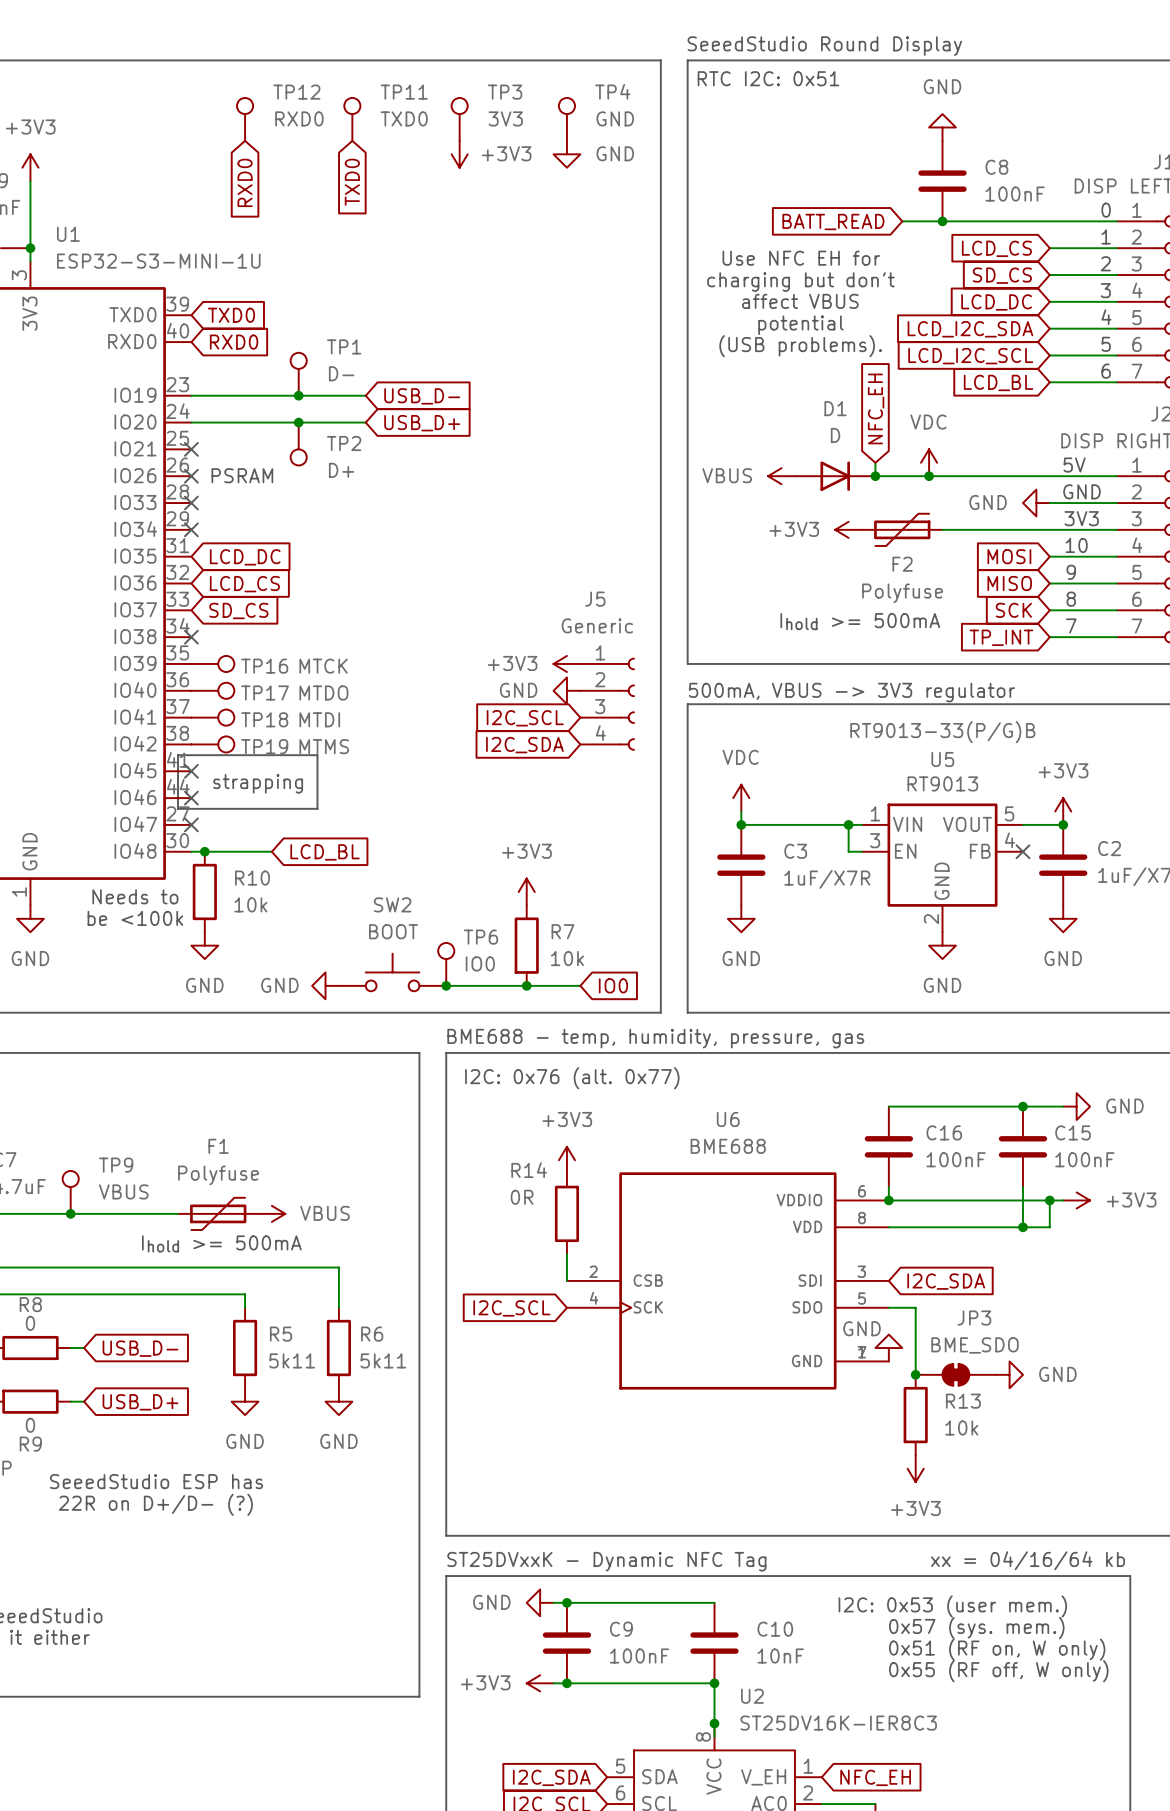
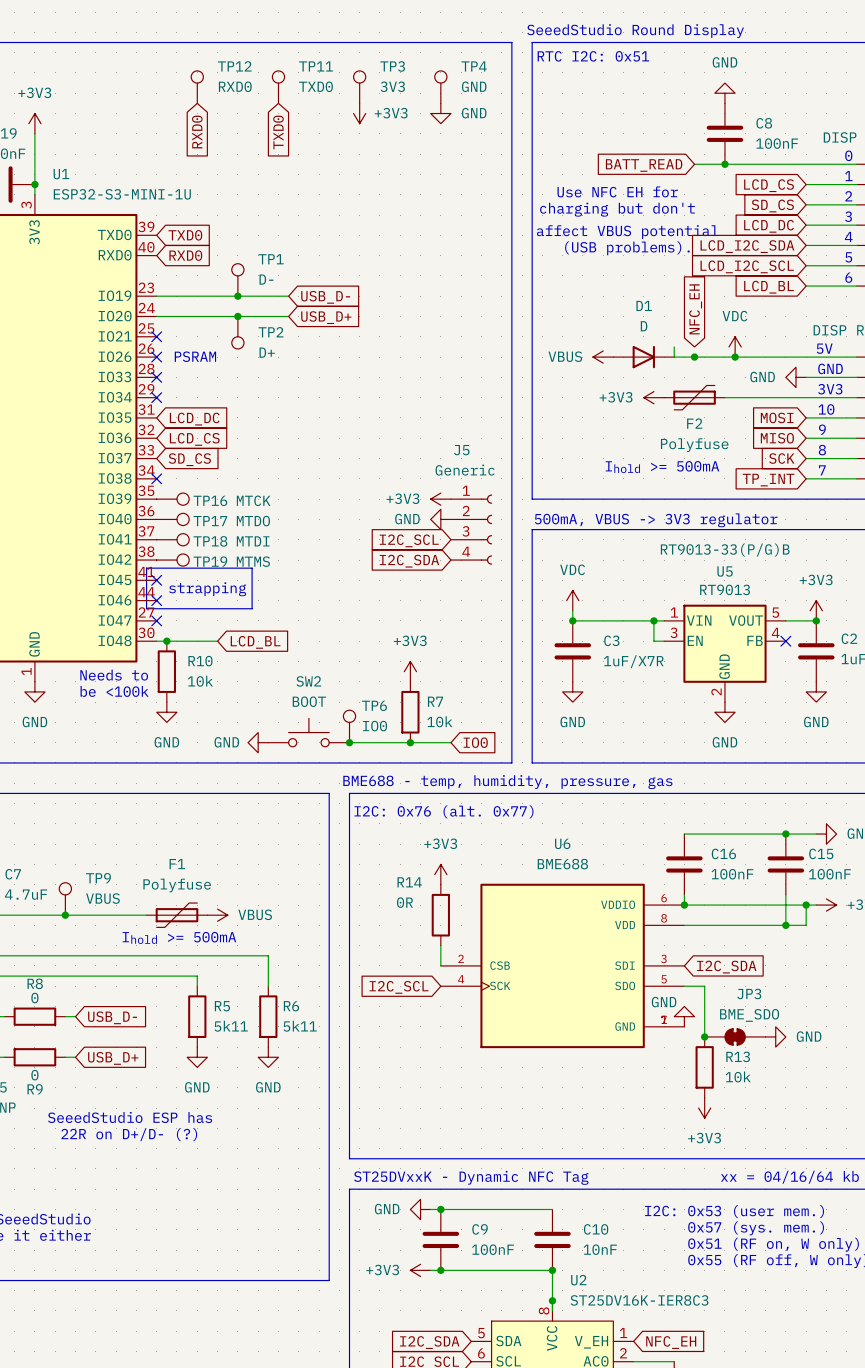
text: affect VBUS (800, 301) -> affect VBUS potential (627, 232)
text: potential (800, 325) -> none
text position: (USB problems). (800, 346) -> (USB problems). (627, 248)
global label position: NFC_EH (876, 408) -> NFC_EH (695, 309)
power symbol position: VDC (929, 462) -> VDC (735, 346)
junction: (875, 476) -> none
junction: none -> (694, 357)
junction: (929, 476) -> none
junction: none -> (735, 357)

